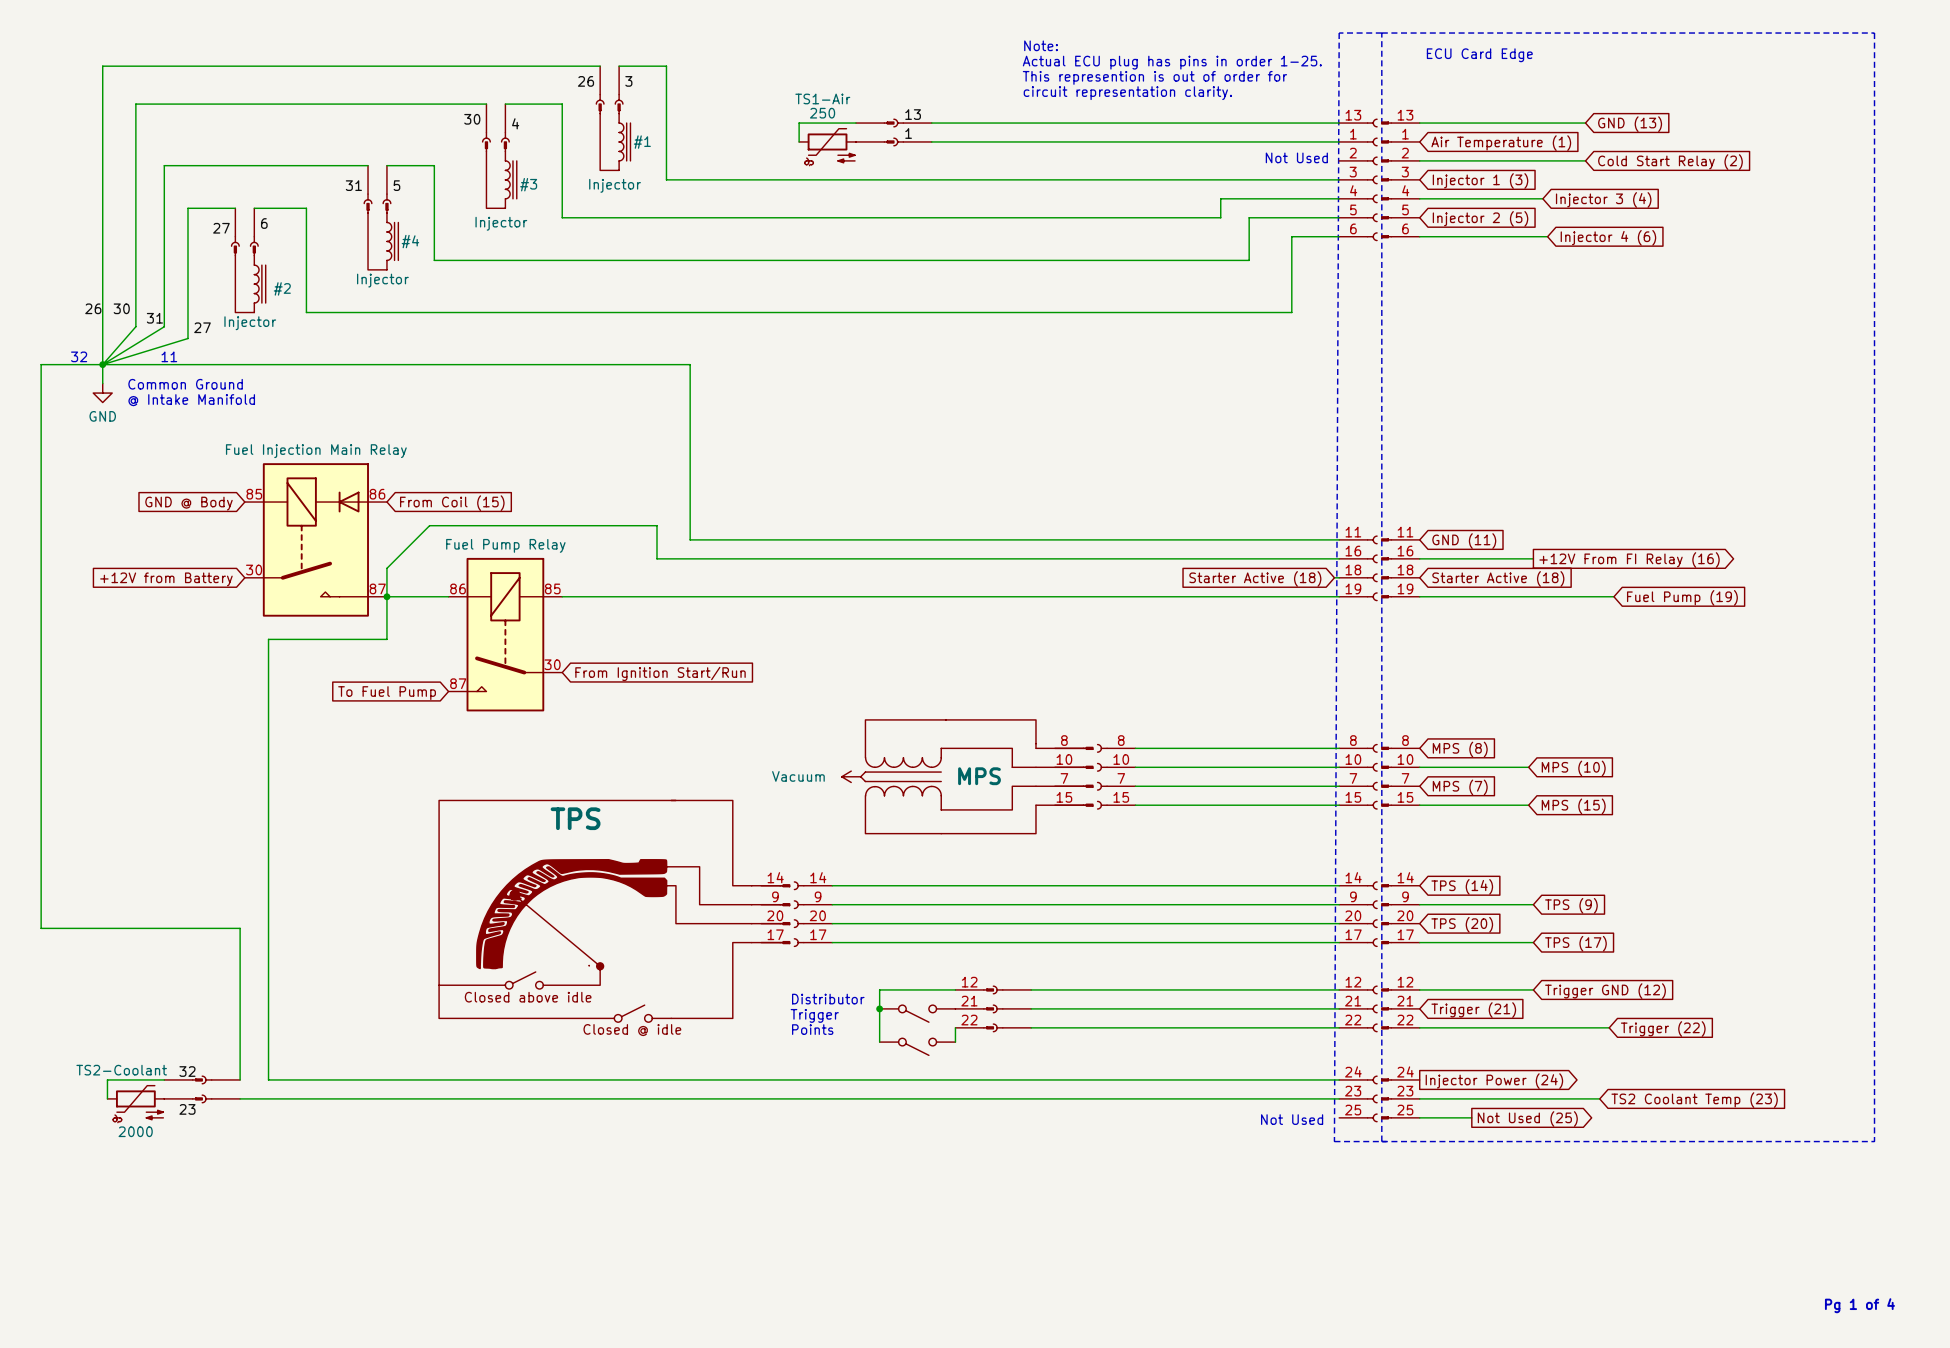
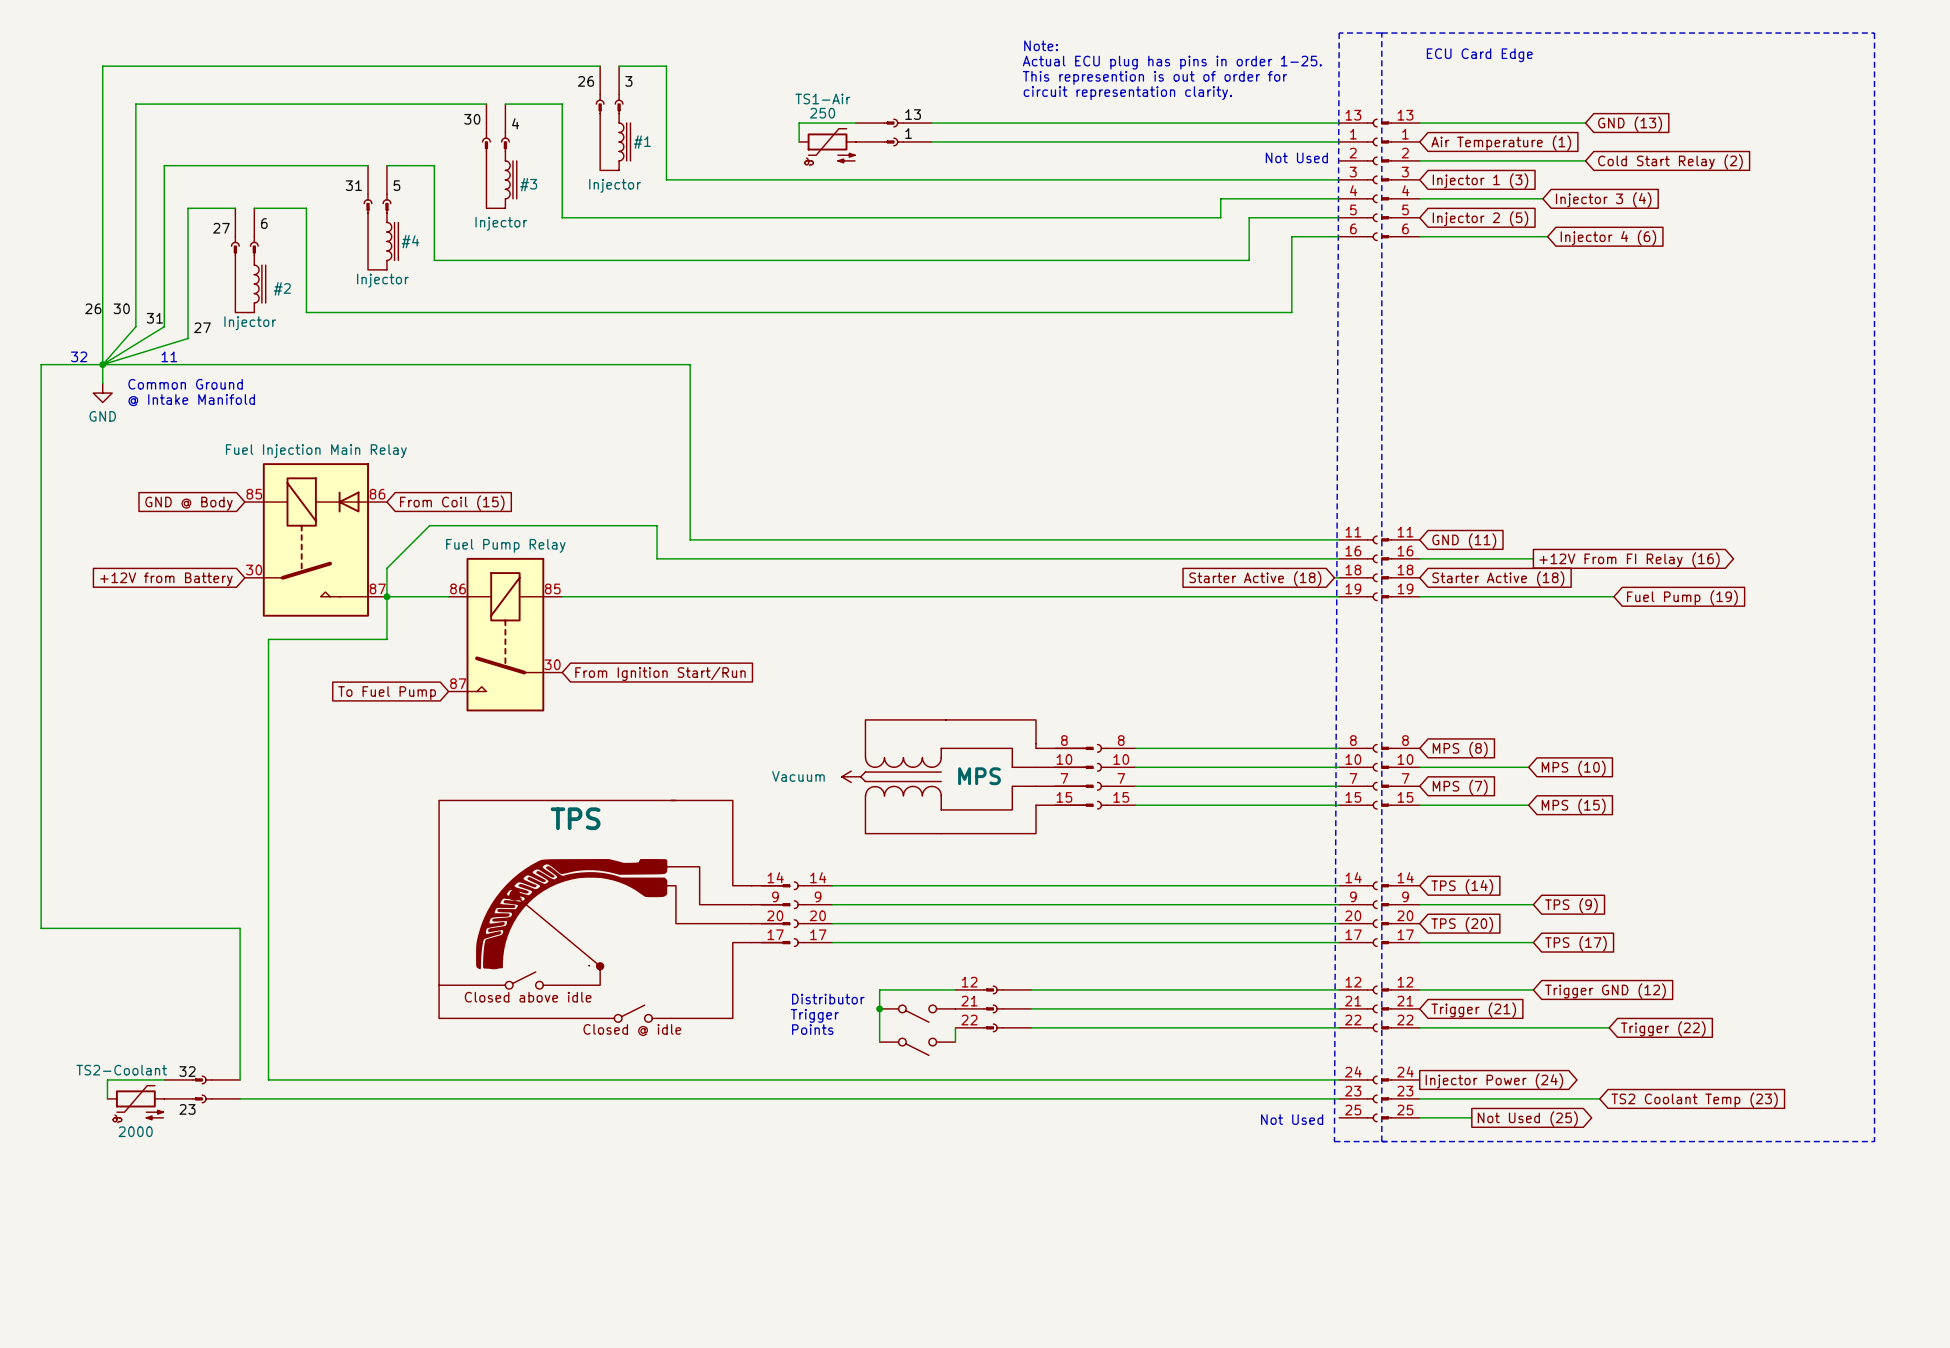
text: Pg 1 of 4 (1859, 1305) -> none

